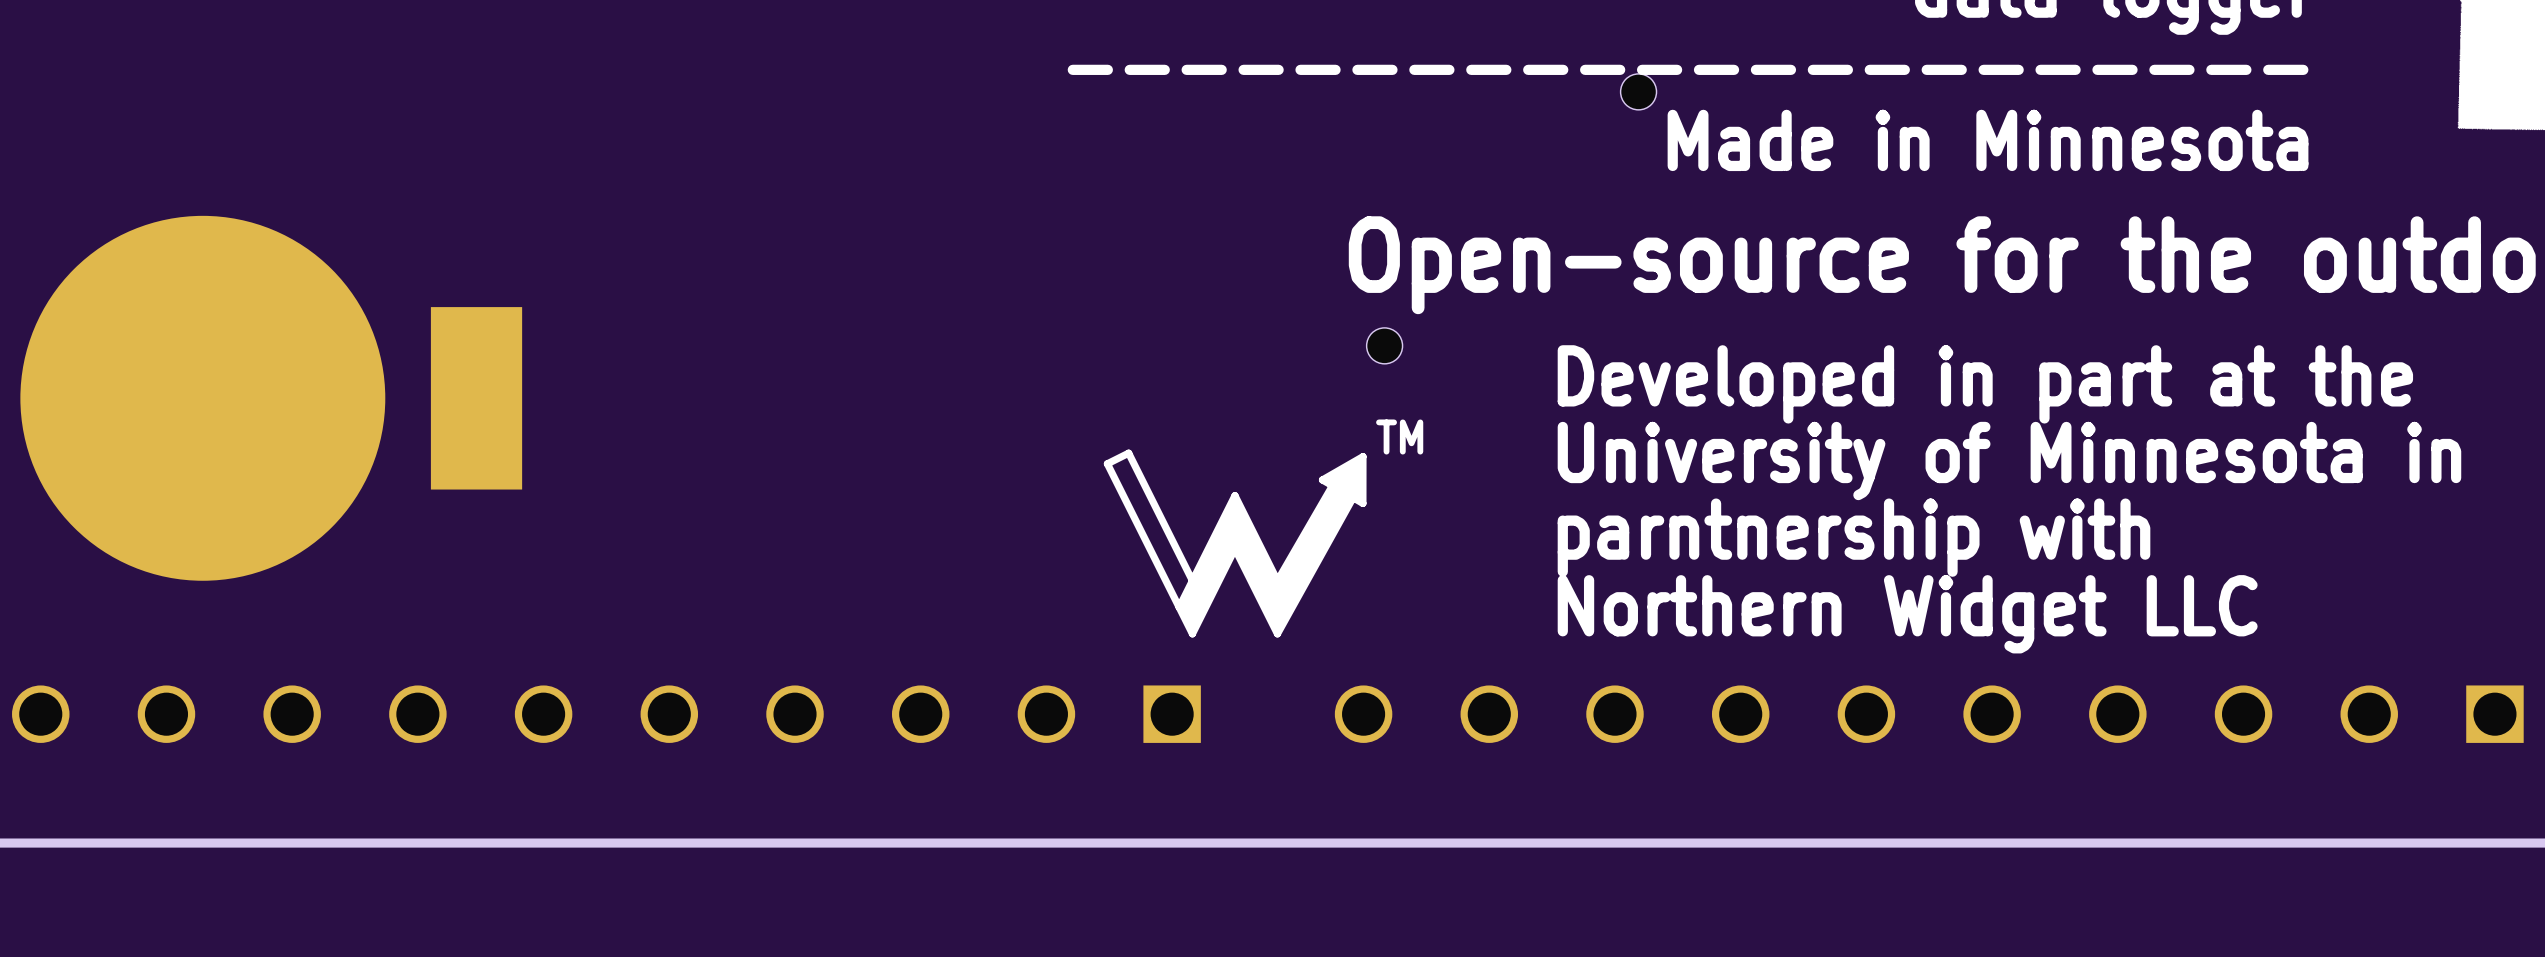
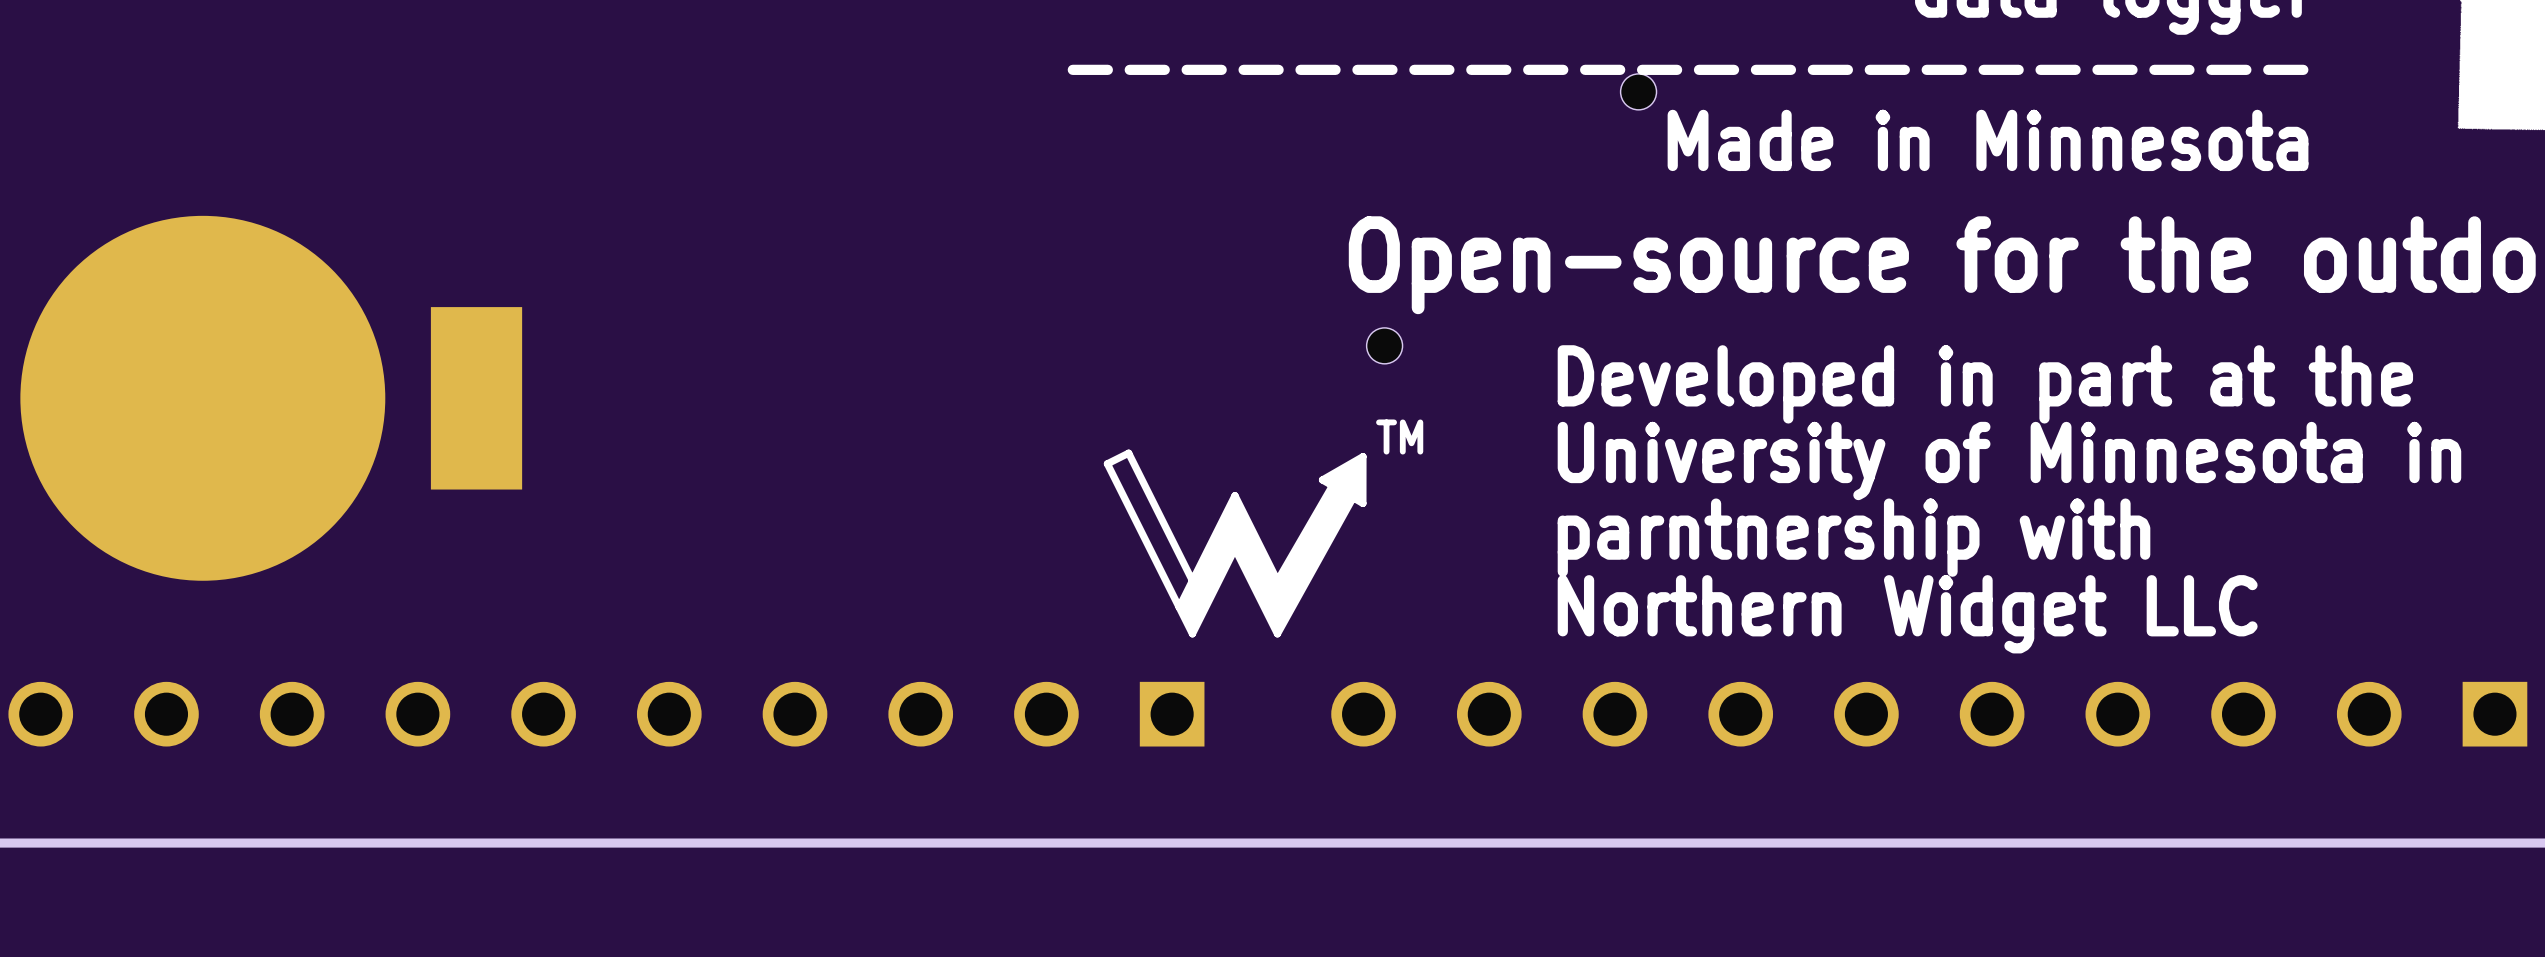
part footprint: [12, 685, 1201, 743] -> [8, 681, 1205, 747]
part footprint: [1334, 685, 2524, 743] -> [1331, 681, 2528, 747]

